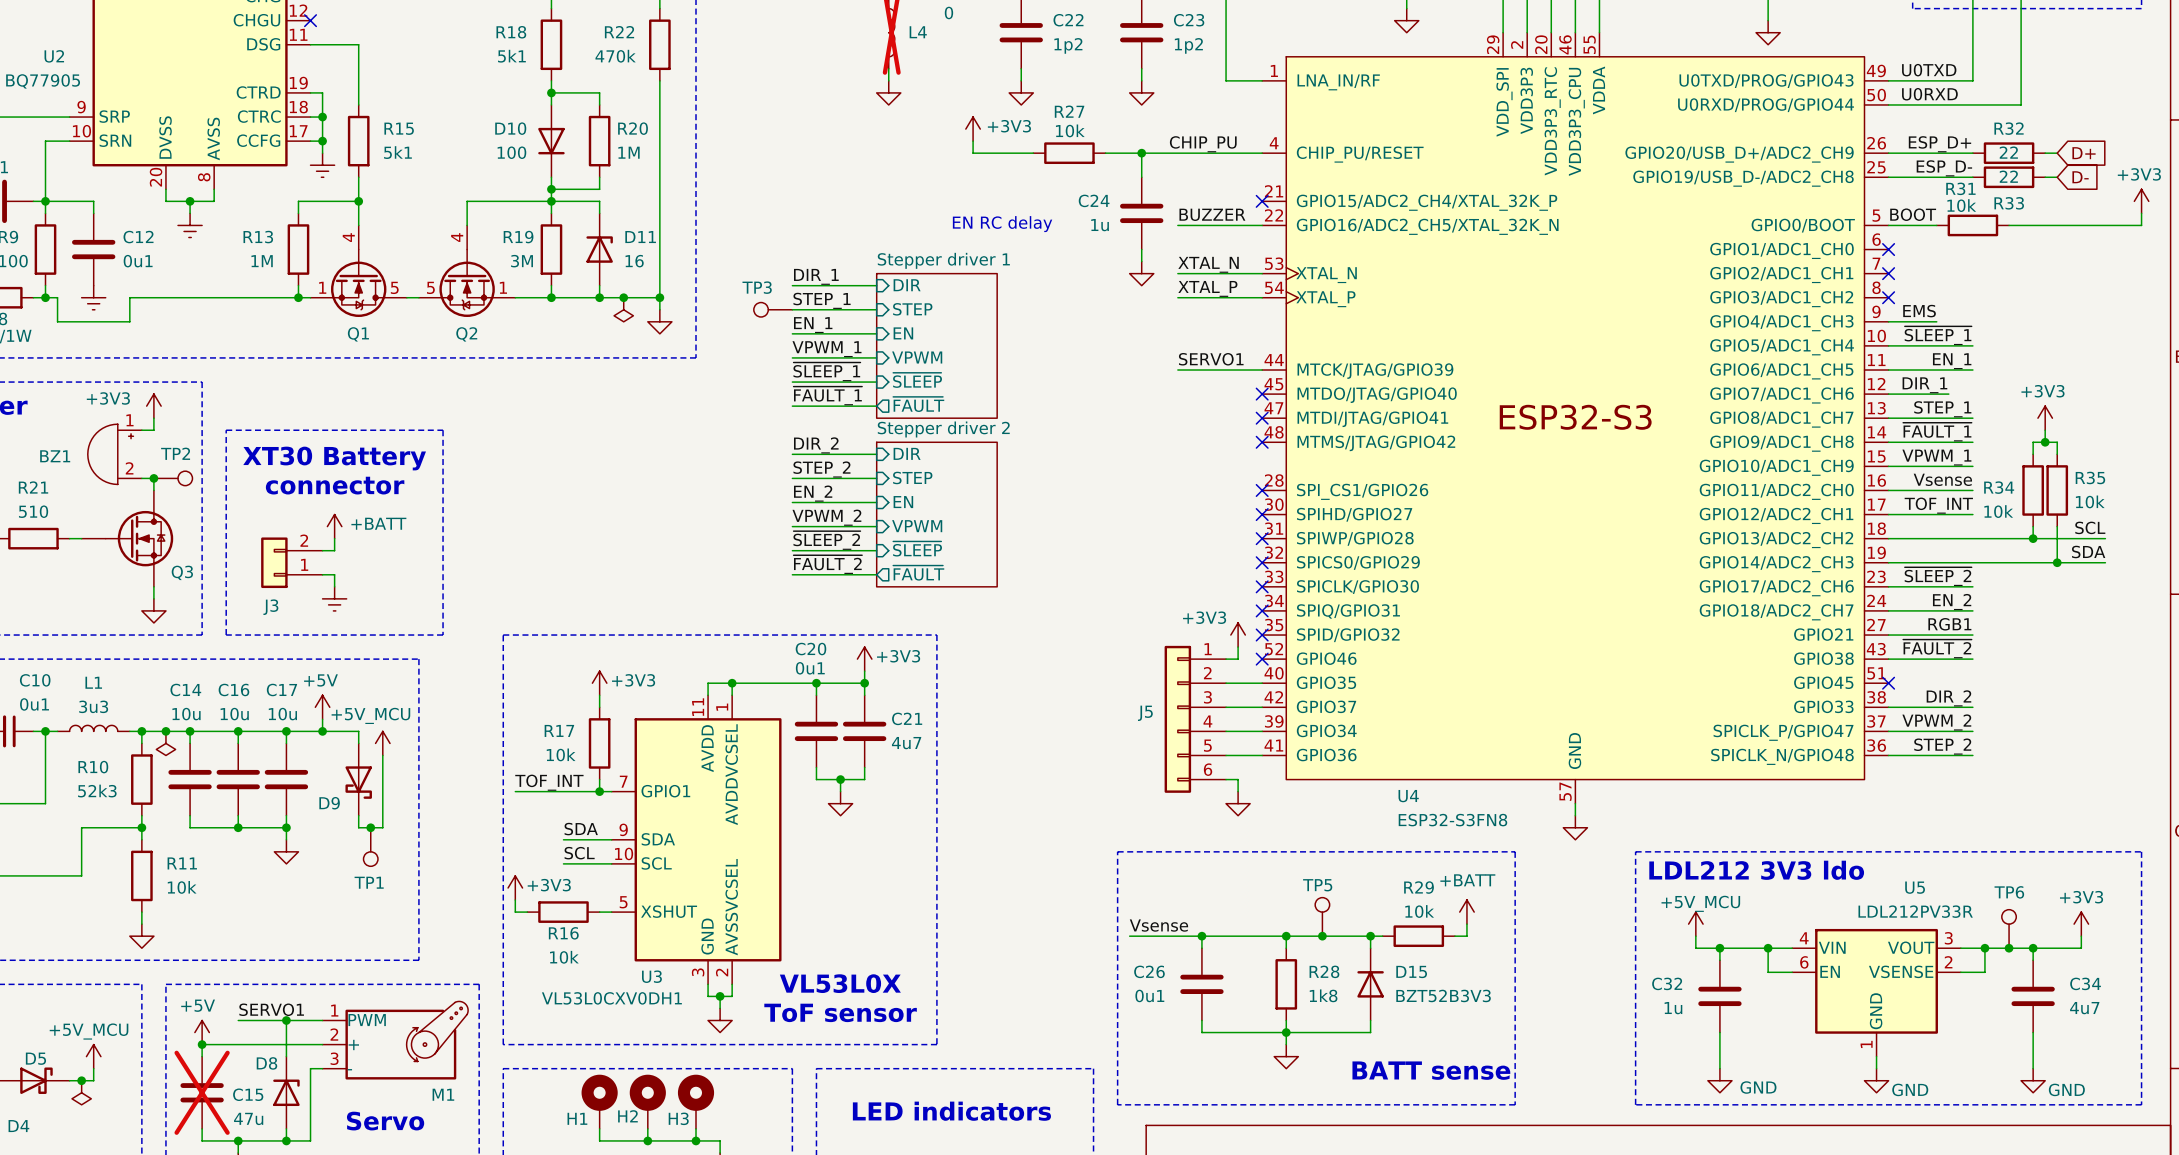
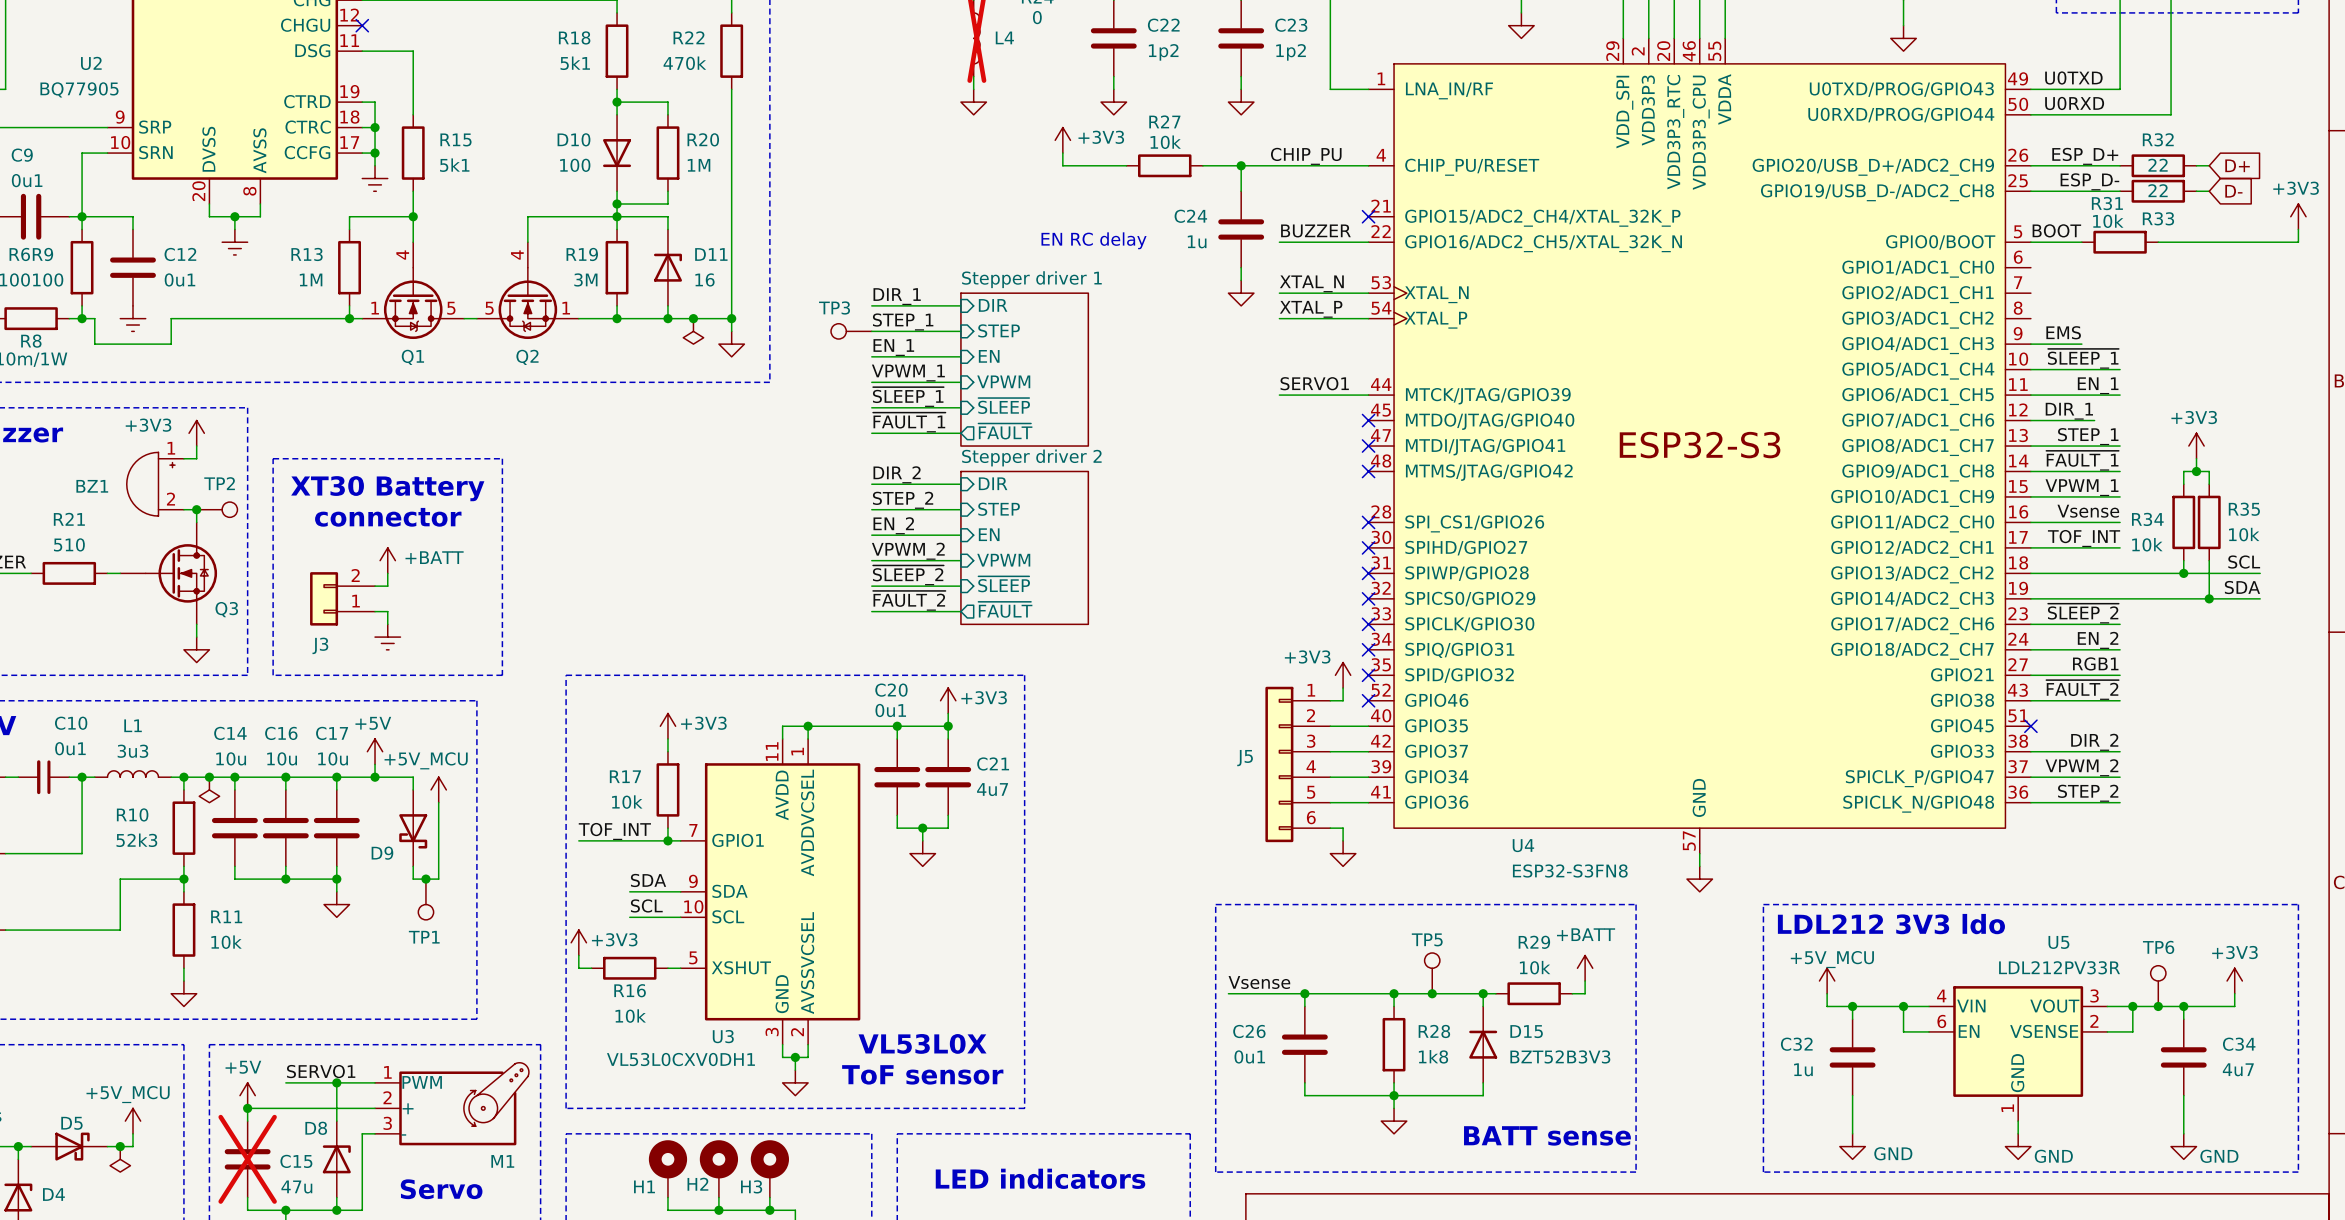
no-connect mark: (1888, 249) -> none
no-connect mark: (1888, 273) -> none
no-connect mark: (1888, 297) -> none

